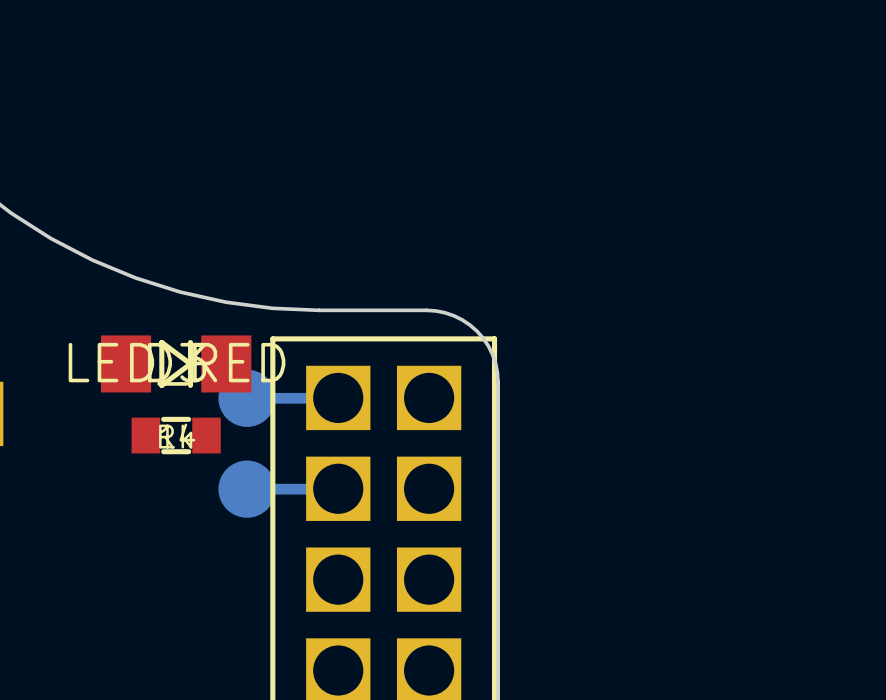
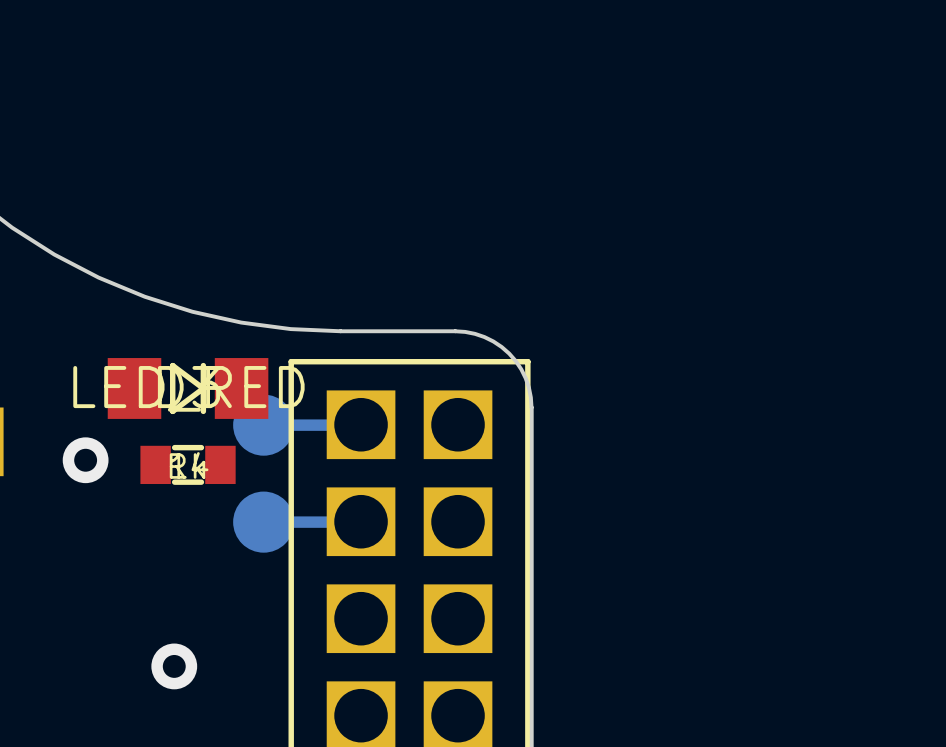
via: none -> (85, 460)
via: none -> (174, 666)

